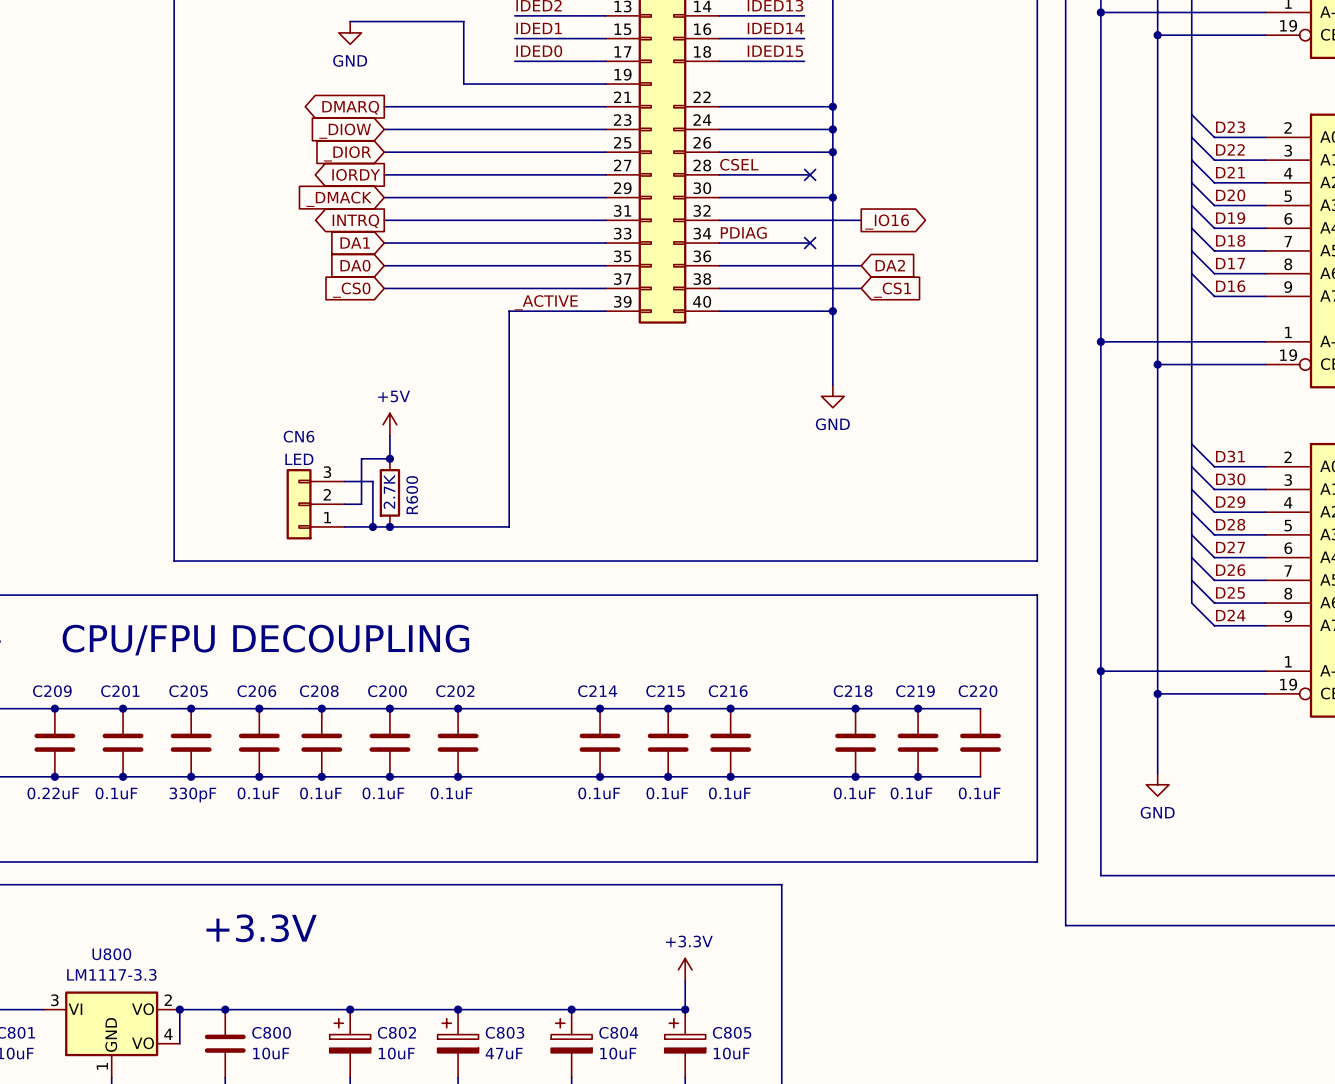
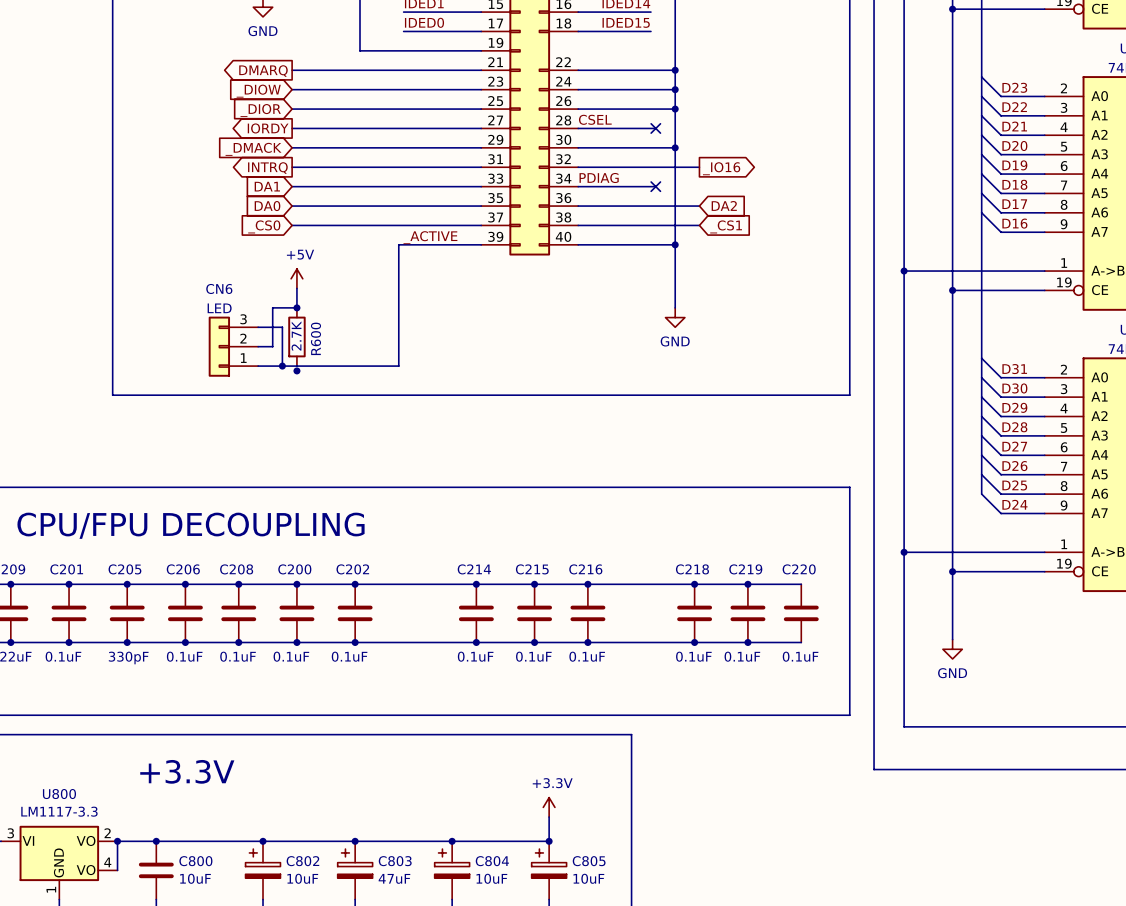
junction: none -> (296, 307)
power symbol position: +5V (389, 424) -> +5V (296, 278)
wire: (389, 436) (389, 458) (361, 458) (361, 504) (344, 504) -> (296, 288) (296, 307) (272, 307) (272, 346) (258, 346)
junction: none -> (282, 366)
wire: (509, 453) (509, 526) (344, 526) -> (398, 366) (258, 366)
wire: (344, 481) (372, 481) (372, 526) -> (258, 327) (282, 327) (282, 366)
line: (174, 487) (174, 561) (1037, 561) (1037, 487) -> (112, 395) (849, 395)
R600 position: (389, 492) -> (296, 336)
CN6 position: (315, 504) -> (233, 346)
junction: (372, 526) -> none
junction: (389, 526) -> none

